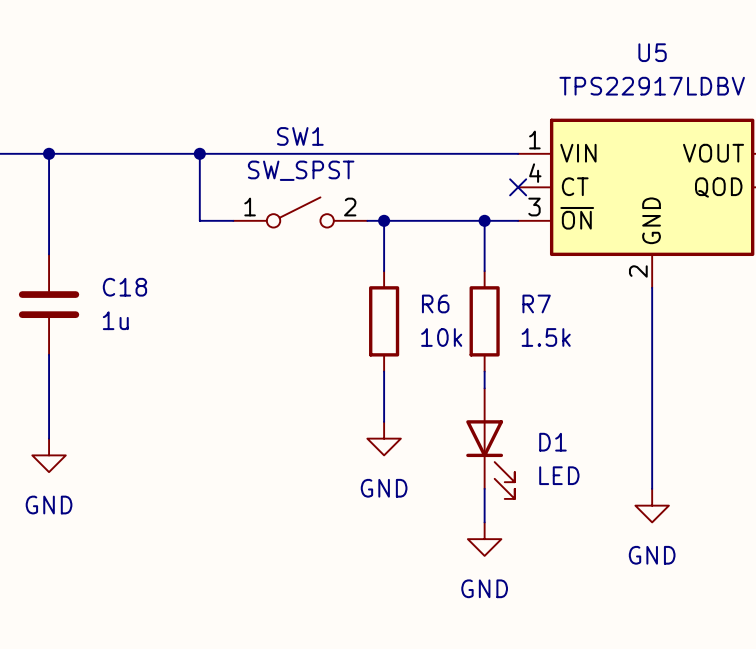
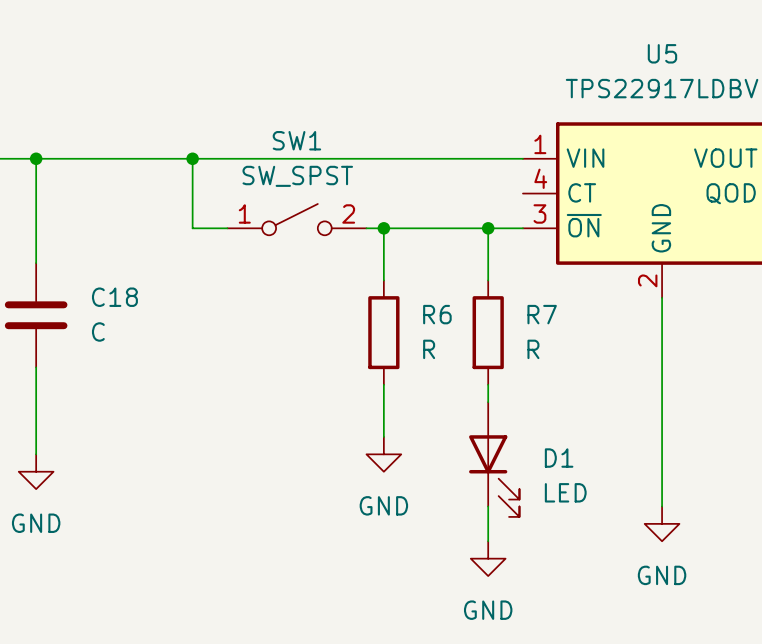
no-connect mark: (518, 187) -> none
C18 value: 1u (115, 320) -> C (98, 331)
R6 value: 10k (441, 337) -> R (429, 349)
R7 value: 1.5k (546, 337) -> R (533, 349)

